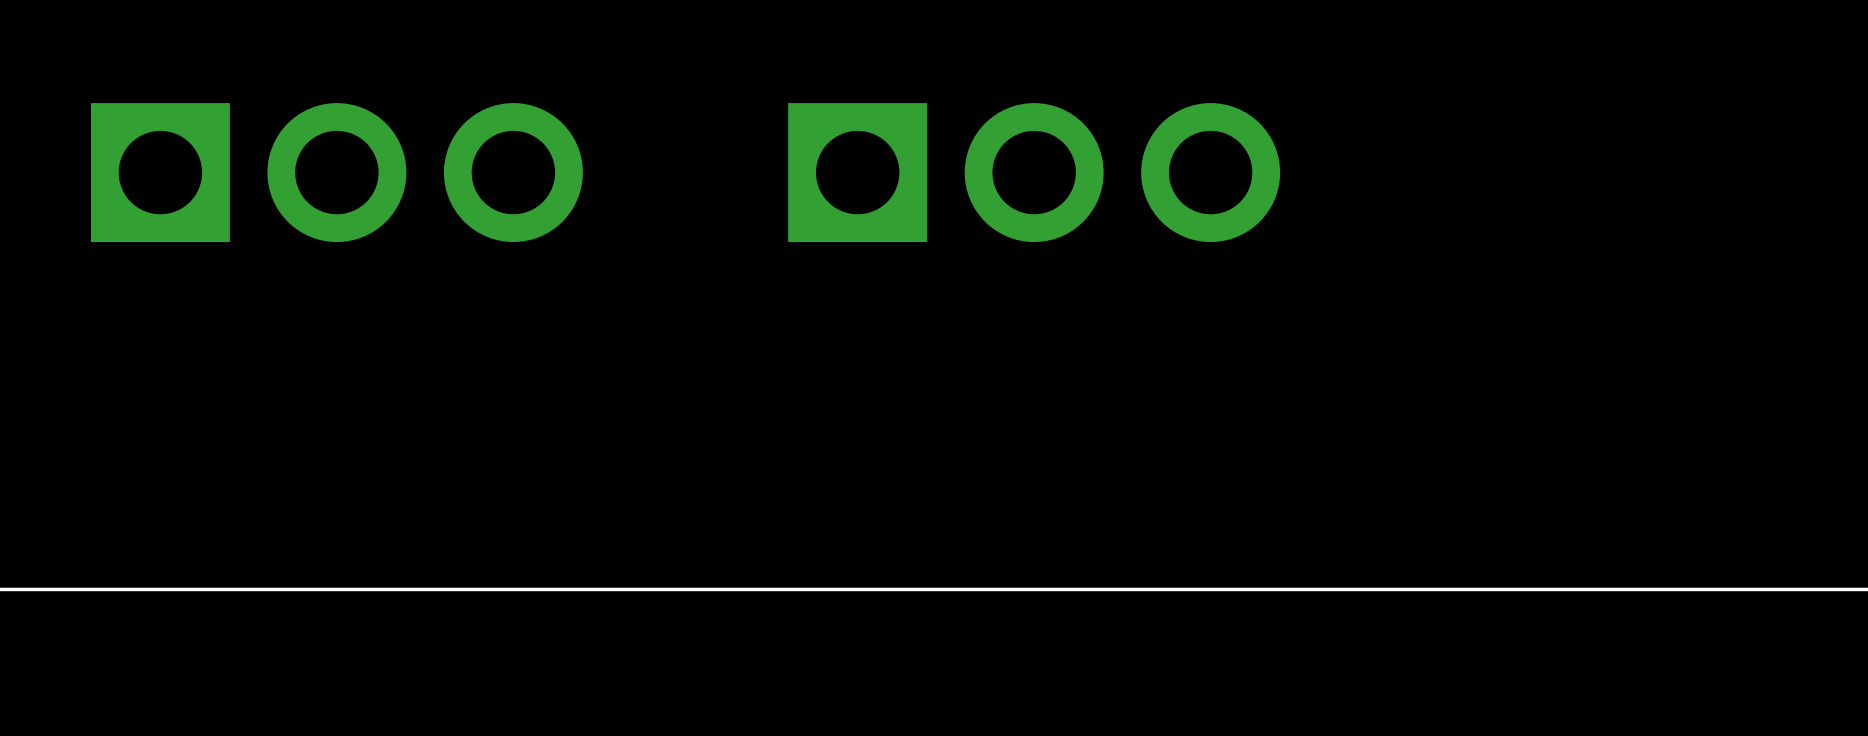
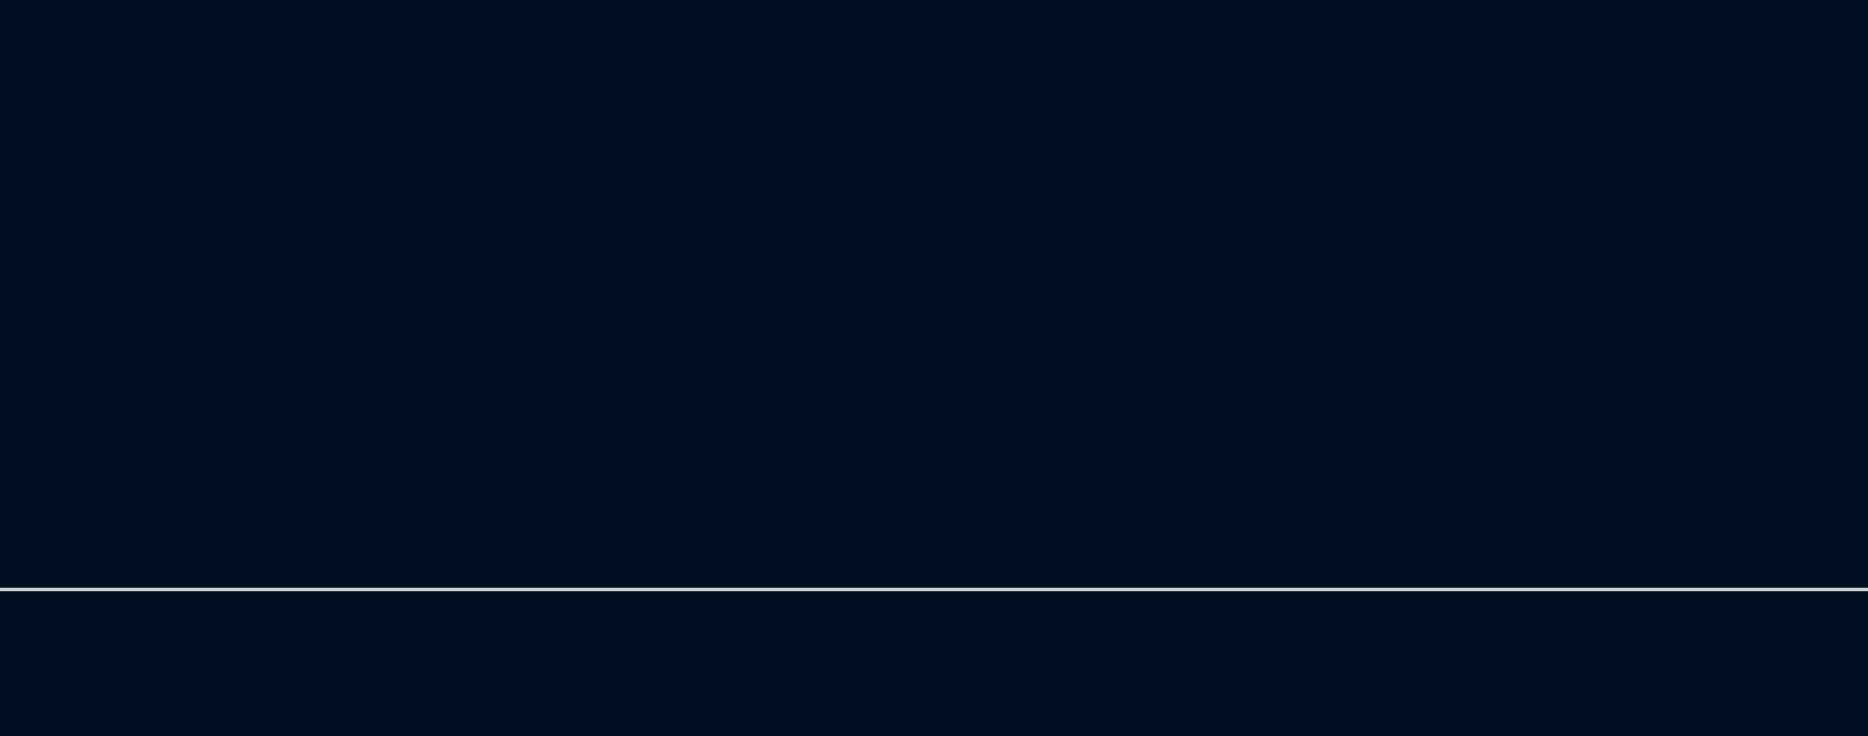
part: (336, 172) -> none
part: (1034, 172) -> none

